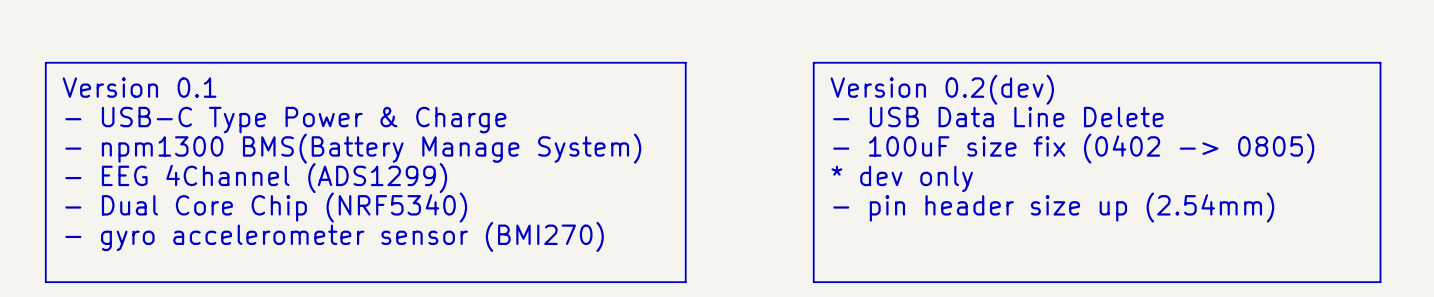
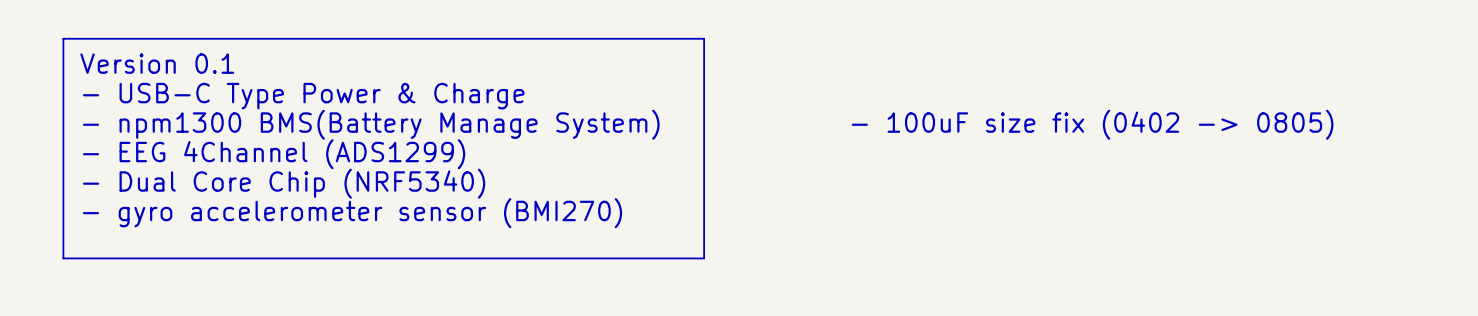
line: (813, 62) (1380, 62) (1380, 282) (813, 282) (813, 62) -> none
text: Version 0.2(dev) (942, 89) -> none
text: - USB Data Line Delete (998, 117) -> none
text: * dev only (902, 178) -> none
text: - pin header size up (2.54mm) (1053, 207) -> none

